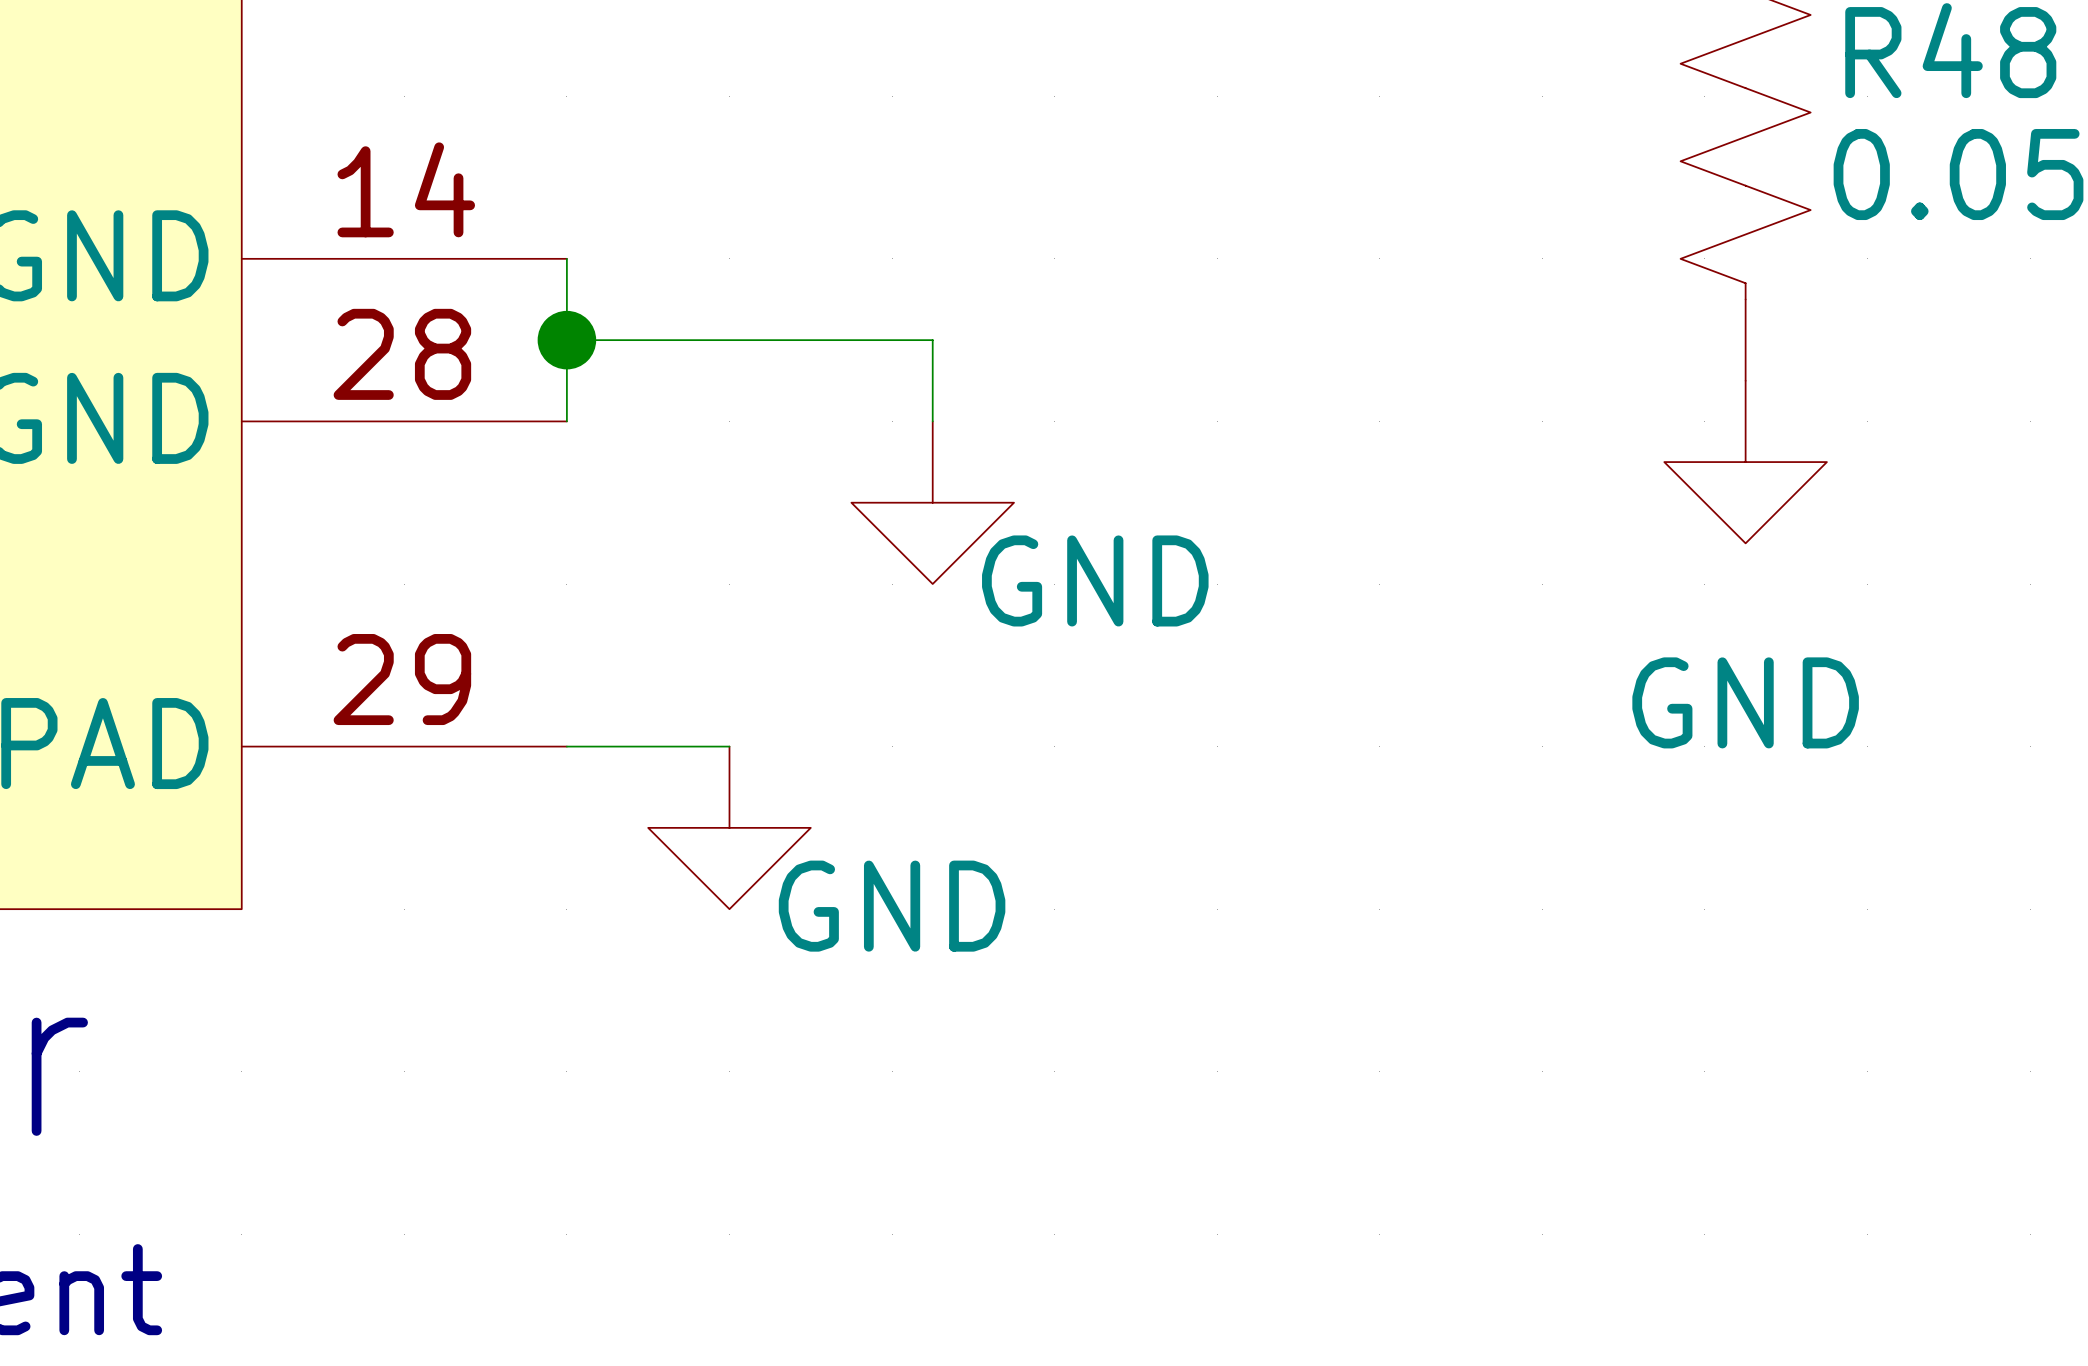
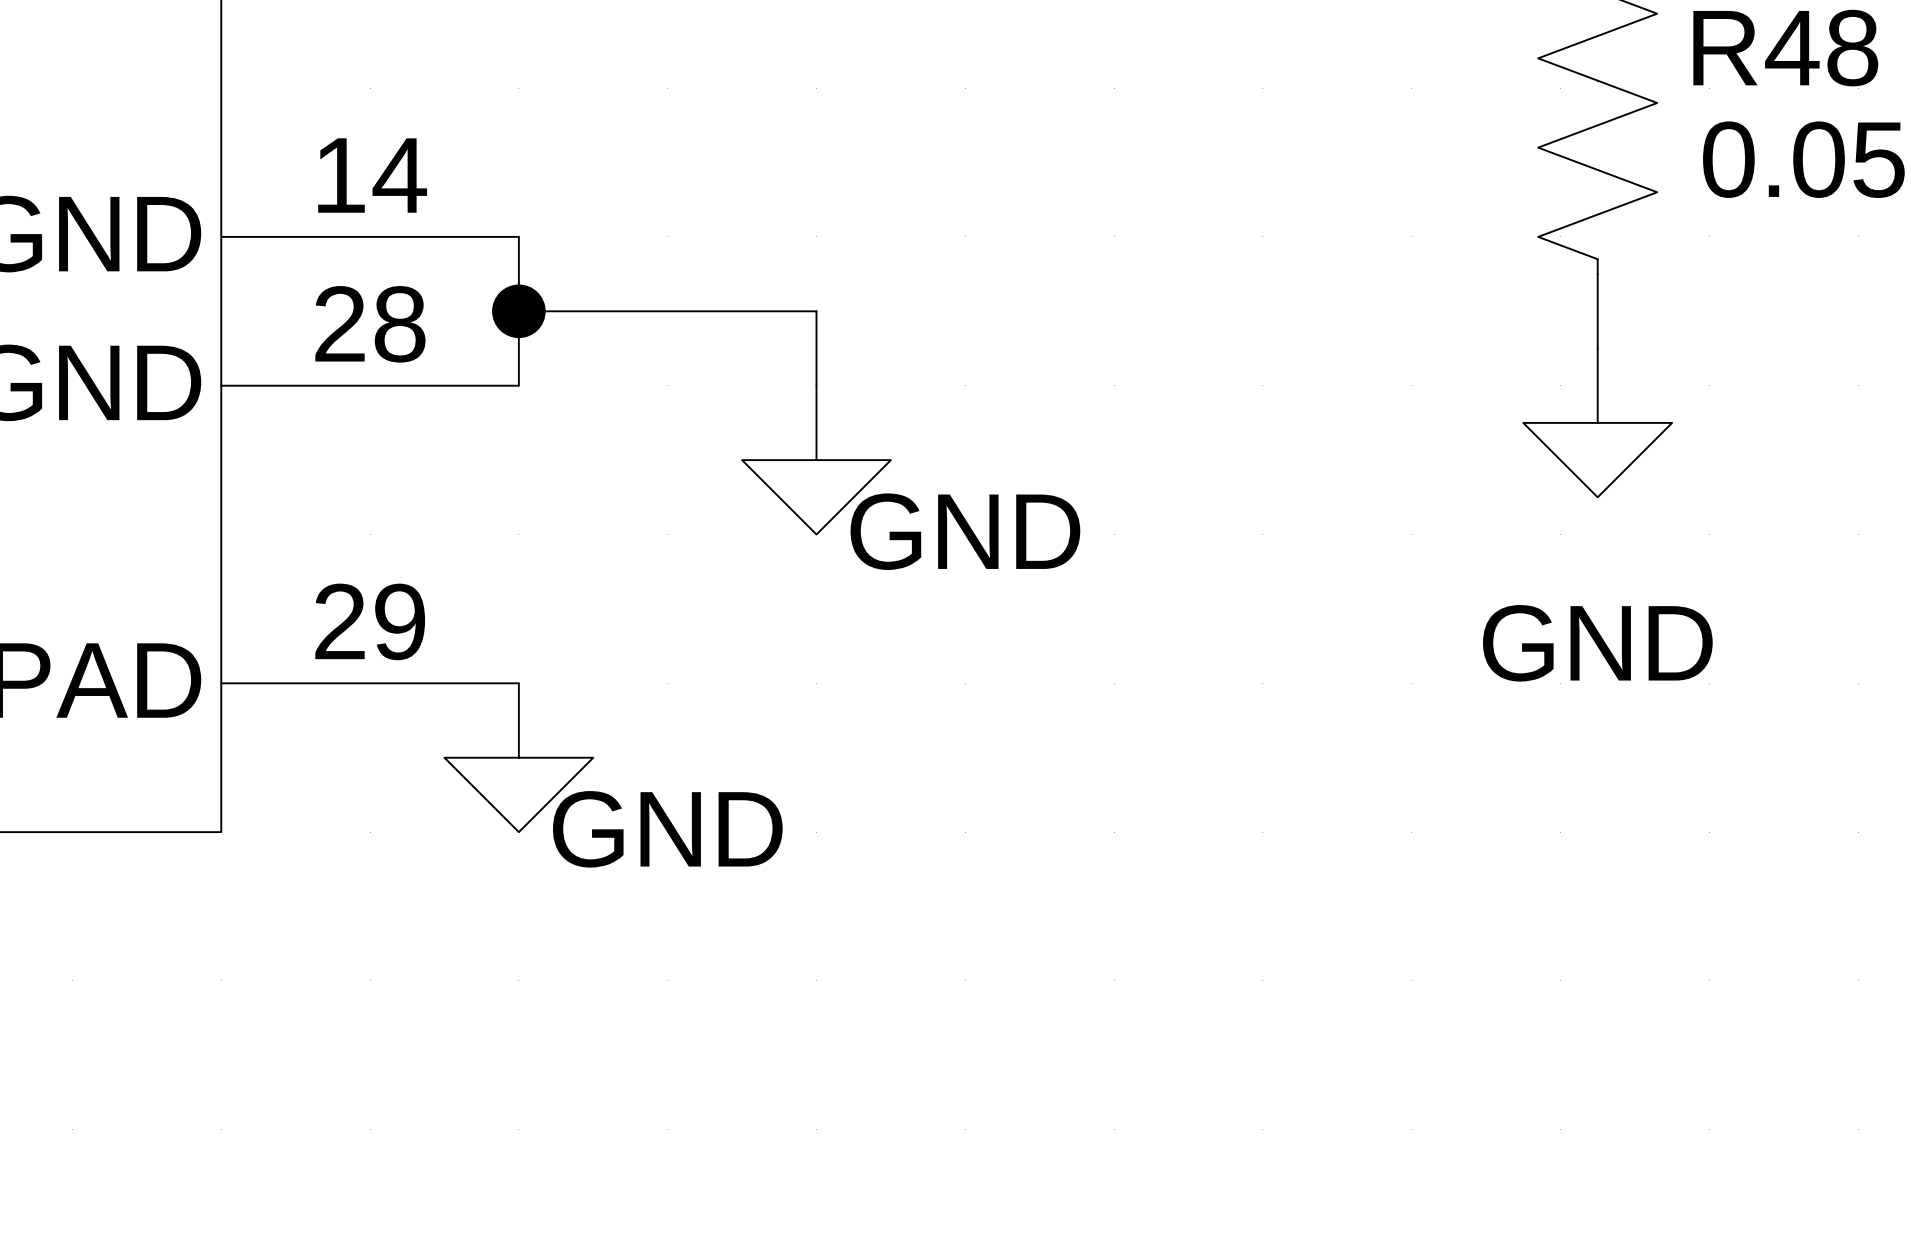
wire: (892, 340) (932, 340) (932, 421) -> (816, 311) (816, 385)
power symbol position: GND (932, 502) -> GND (816, 460)
wire: (566, 746) (729, 746) -> none
power symbol position: GND (729, 827) -> GND (518, 757)

